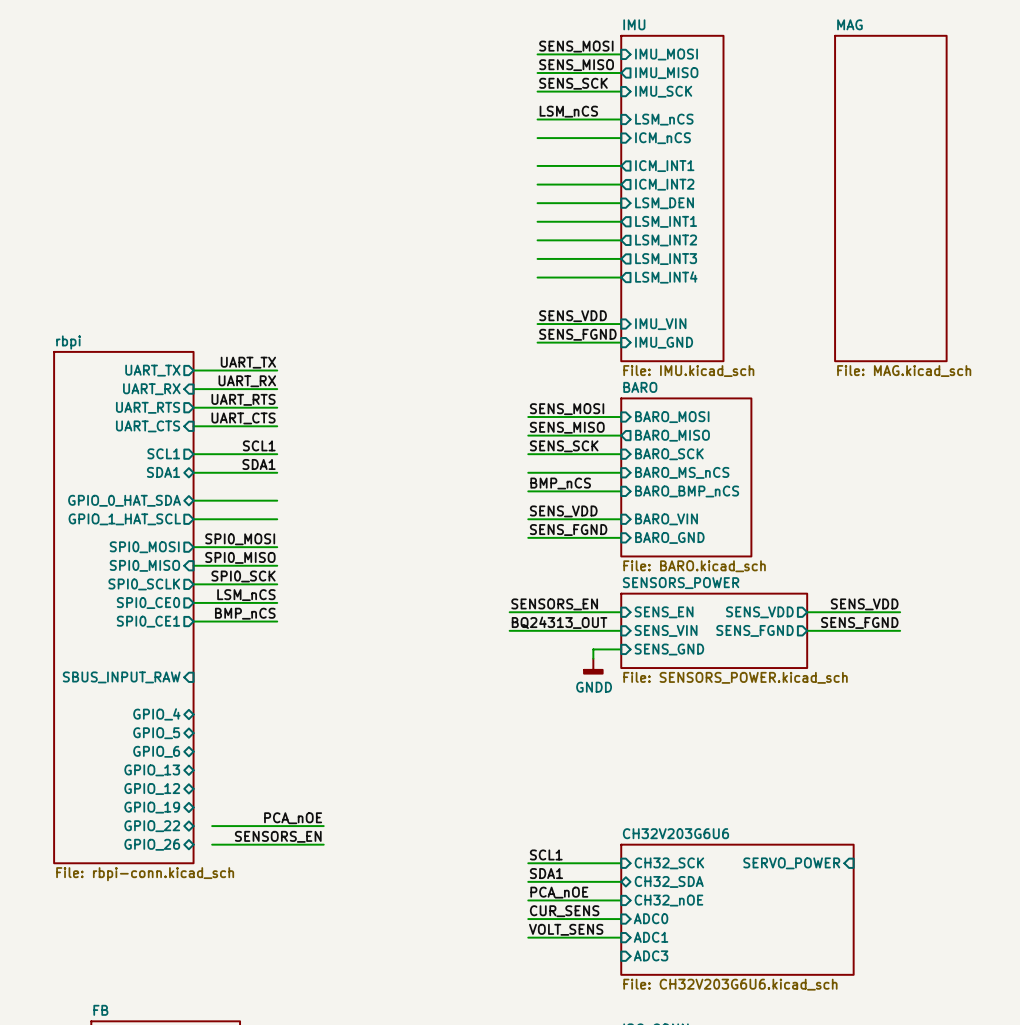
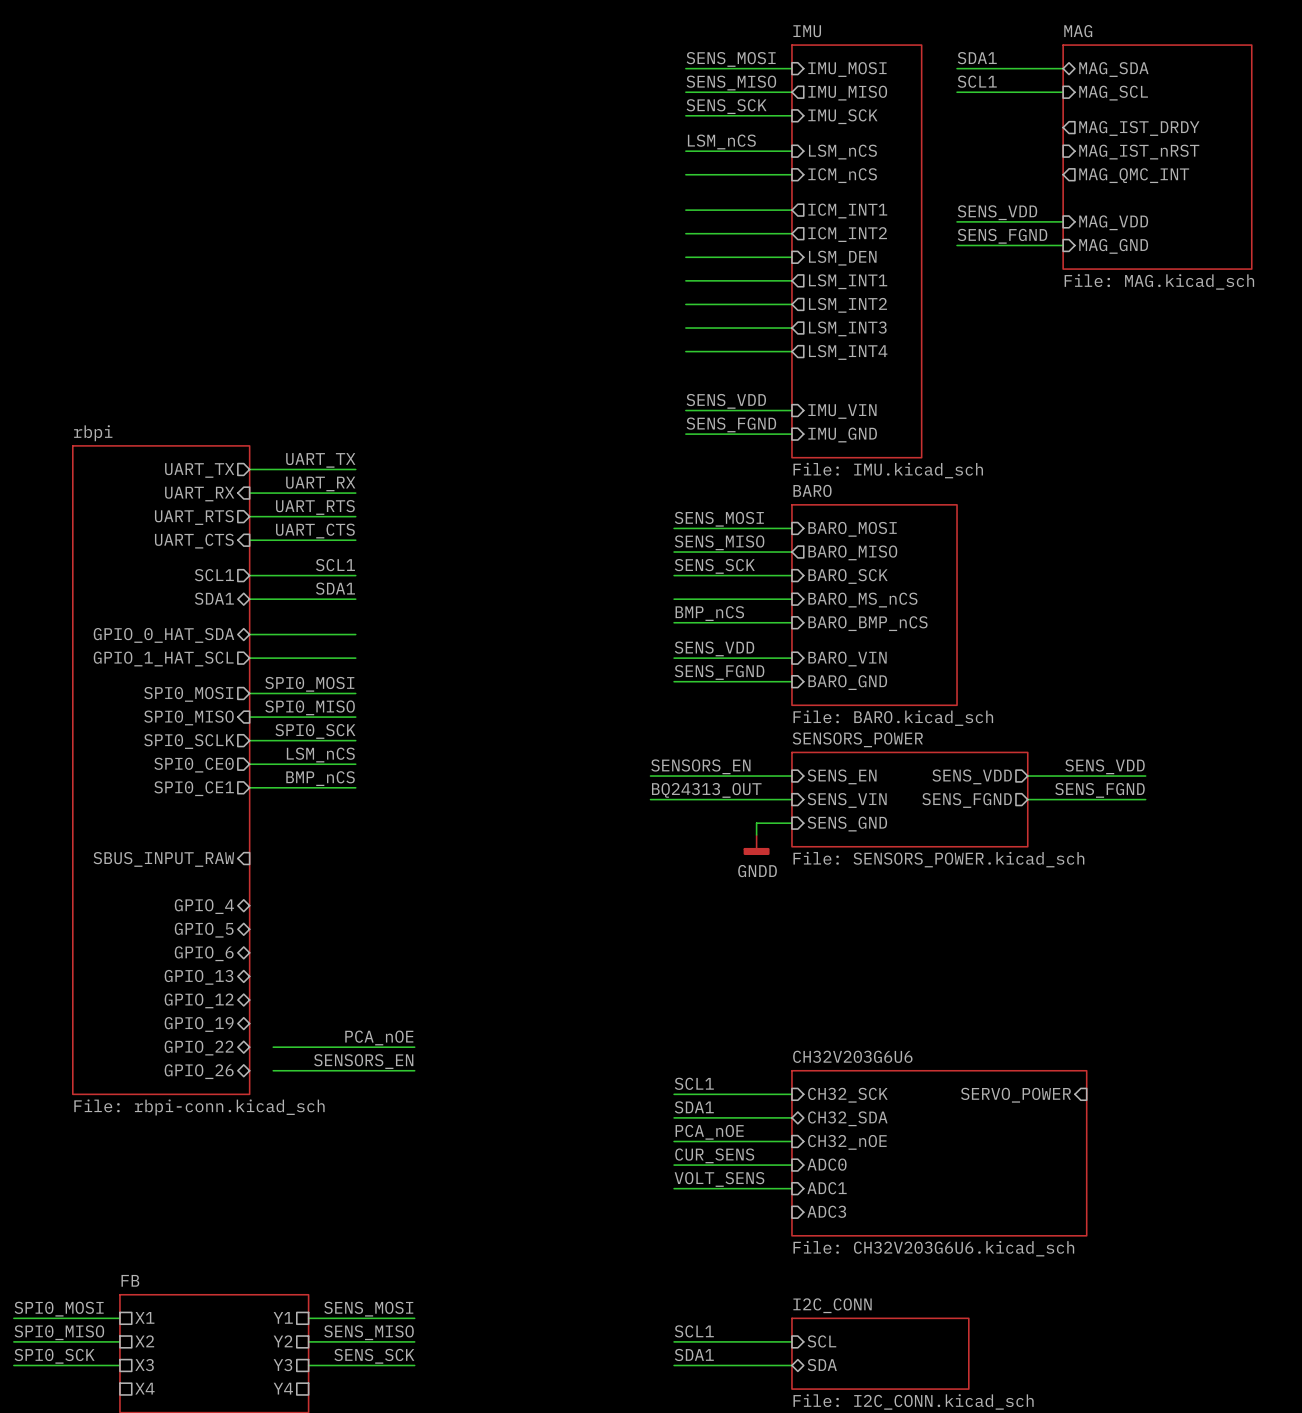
label: none -> SDA1 (977, 58)
wire: none -> (957, 68) (1063, 68)
sheet pin: none -> MAG_SDA (1113, 69)
label: none -> SCL1 (977, 81)
wire: none -> (957, 92) (1063, 92)
sheet pin: none -> MAG_SCL (1113, 93)
sheet pin: none -> MAG_IST_DRDY (1139, 128)
sheet pin: none -> MAG_IST_nRST (1139, 152)
sheet MAG: none -> File: MAG.kicad_sch (1157, 157)
sheet pin: none -> MAG_QMC_INT (1134, 175)
label: none -> SENS_VDD (997, 212)
wire: none -> (957, 221) (1063, 221)
sheet pin: none -> MAG_VDD (1113, 222)
label: none -> SENS_FGND (1002, 236)
wire: none -> (957, 245) (1063, 245)
sheet pin: none -> MAG_GND (1113, 246)
sheet MAG: File: MAG.kicad_sch (890, 198) -> none

